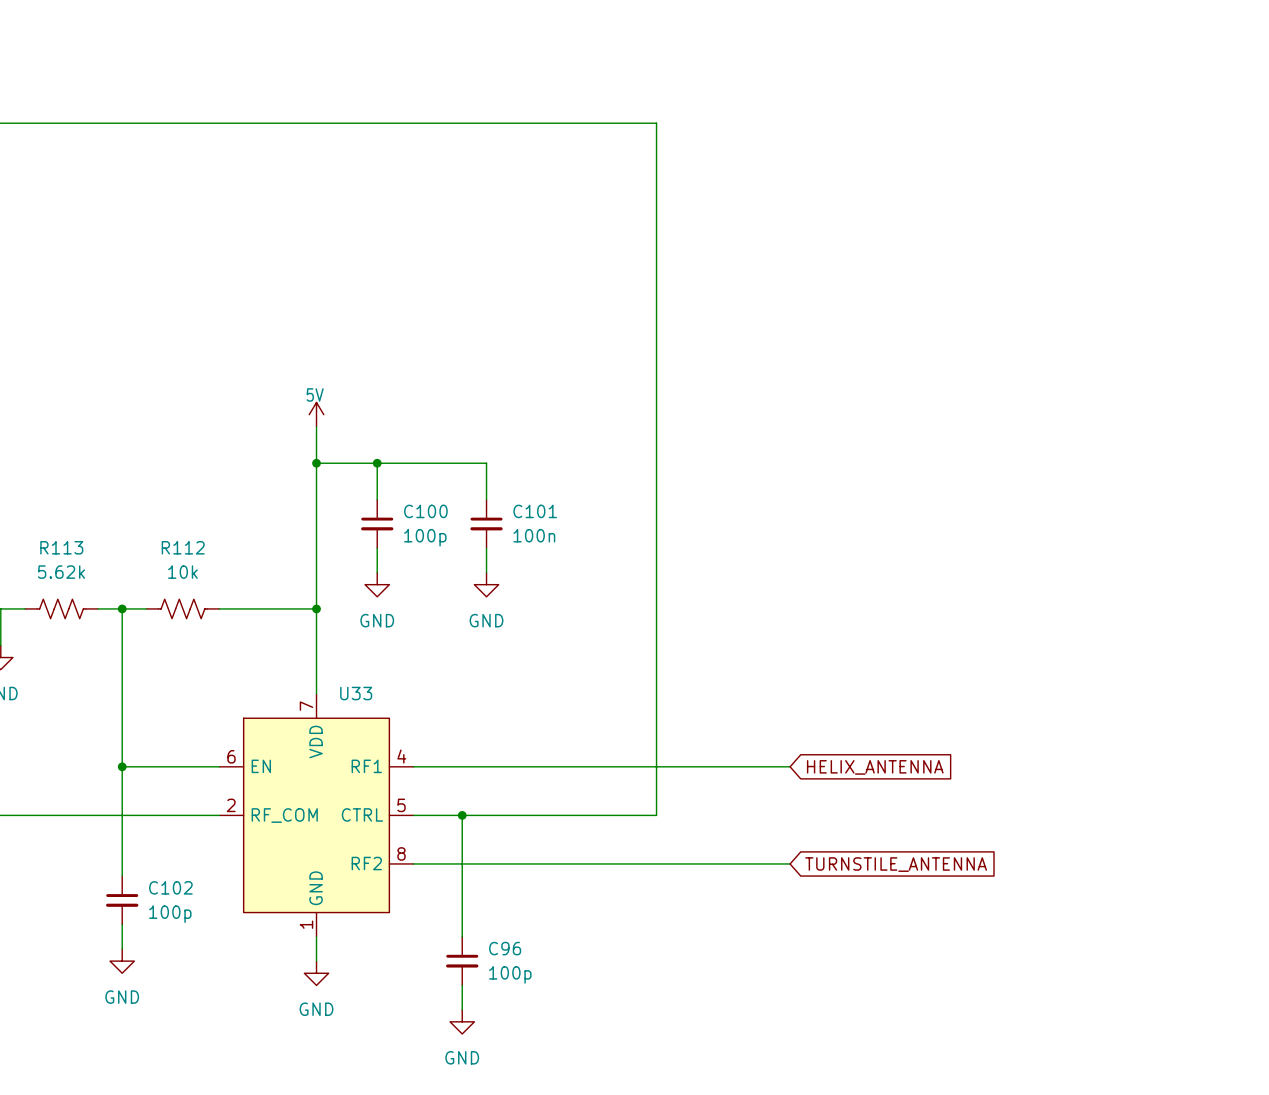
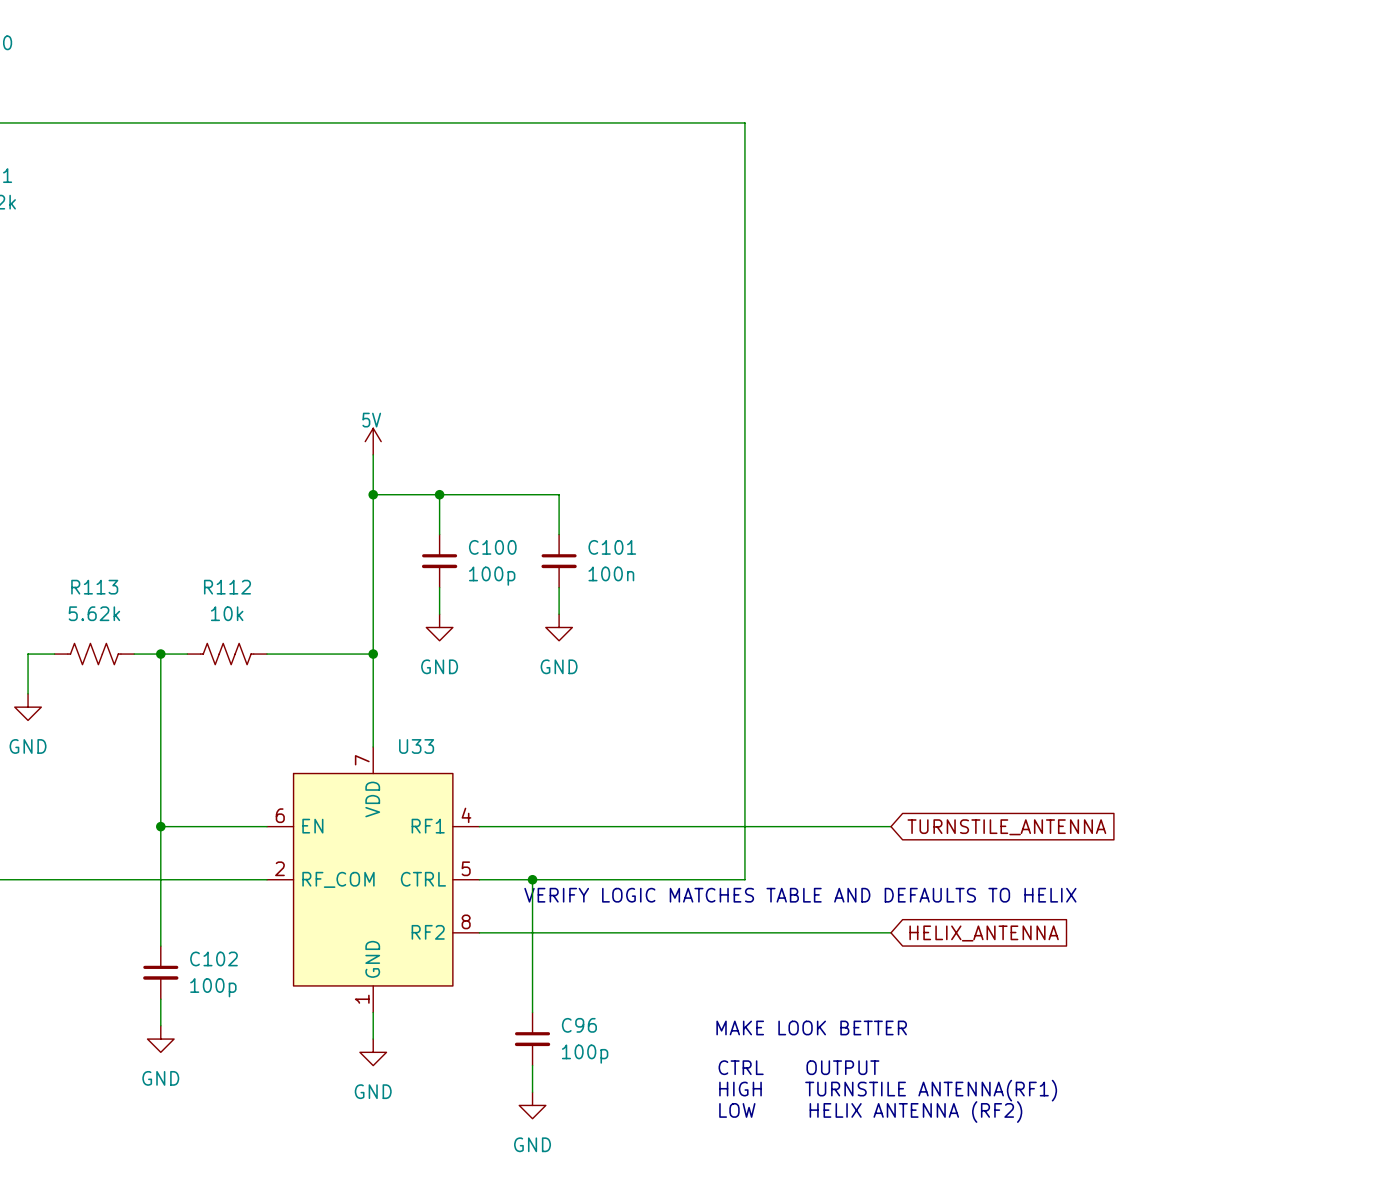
global label: HELIX_ANTENNA (875, 767) -> TURNSTILE_ANTENNA (1006, 827)
text: none -> VERIFY LOGIC MATCHES TABLE AND DEFAULTS TO HELIX (800, 895)
global label: TURNSTILE_ANTENNA (896, 864) -> HELIX_ANTENNA (984, 933)
text: none -> MAKE LOOK BETTER (811, 1027)
text: none -> CTRL OUTPUT (798, 1067)
text: none -> HIGH TURNSTILE ANTENNA(RF1) (888, 1090)
text: none -> LOW HELIX ANTENNA (RF2) (870, 1112)

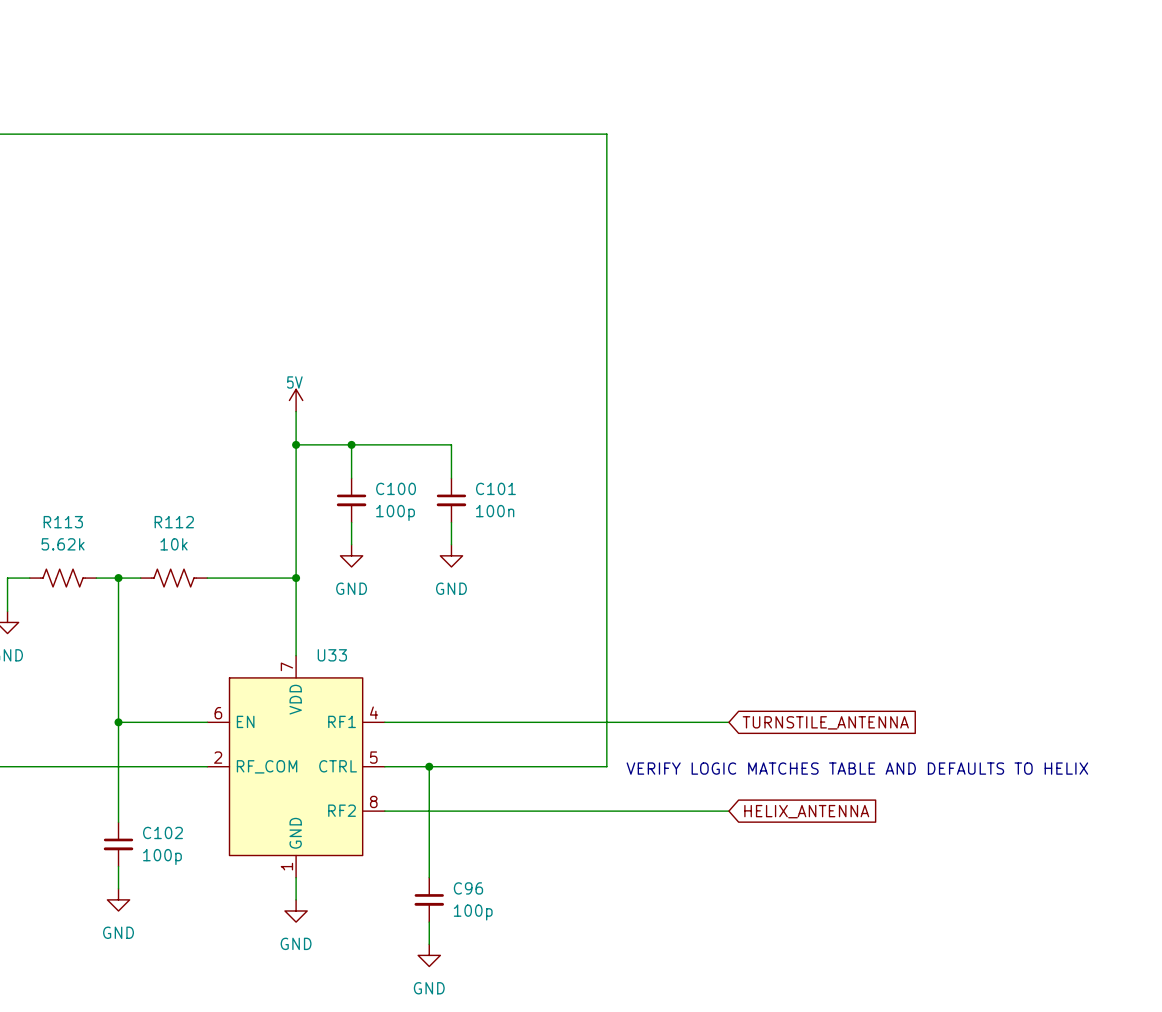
text position: VERIFY LOGIC MATCHES TABLE AND DEFAULTS TO HELIX (800, 895) -> VERIFY LOGIC MATCHES TABLE AND DEFAULTS TO HELIX (857, 768)
text: MAKE LOOK BETTER (811, 1027) -> none
text: CTRL OUTPUT (798, 1067) -> none
text: HIGH TURNSTILE ANTENNA(RF1) (888, 1090) -> none
text: LOW HELIX ANTENNA (RF2) (870, 1112) -> none

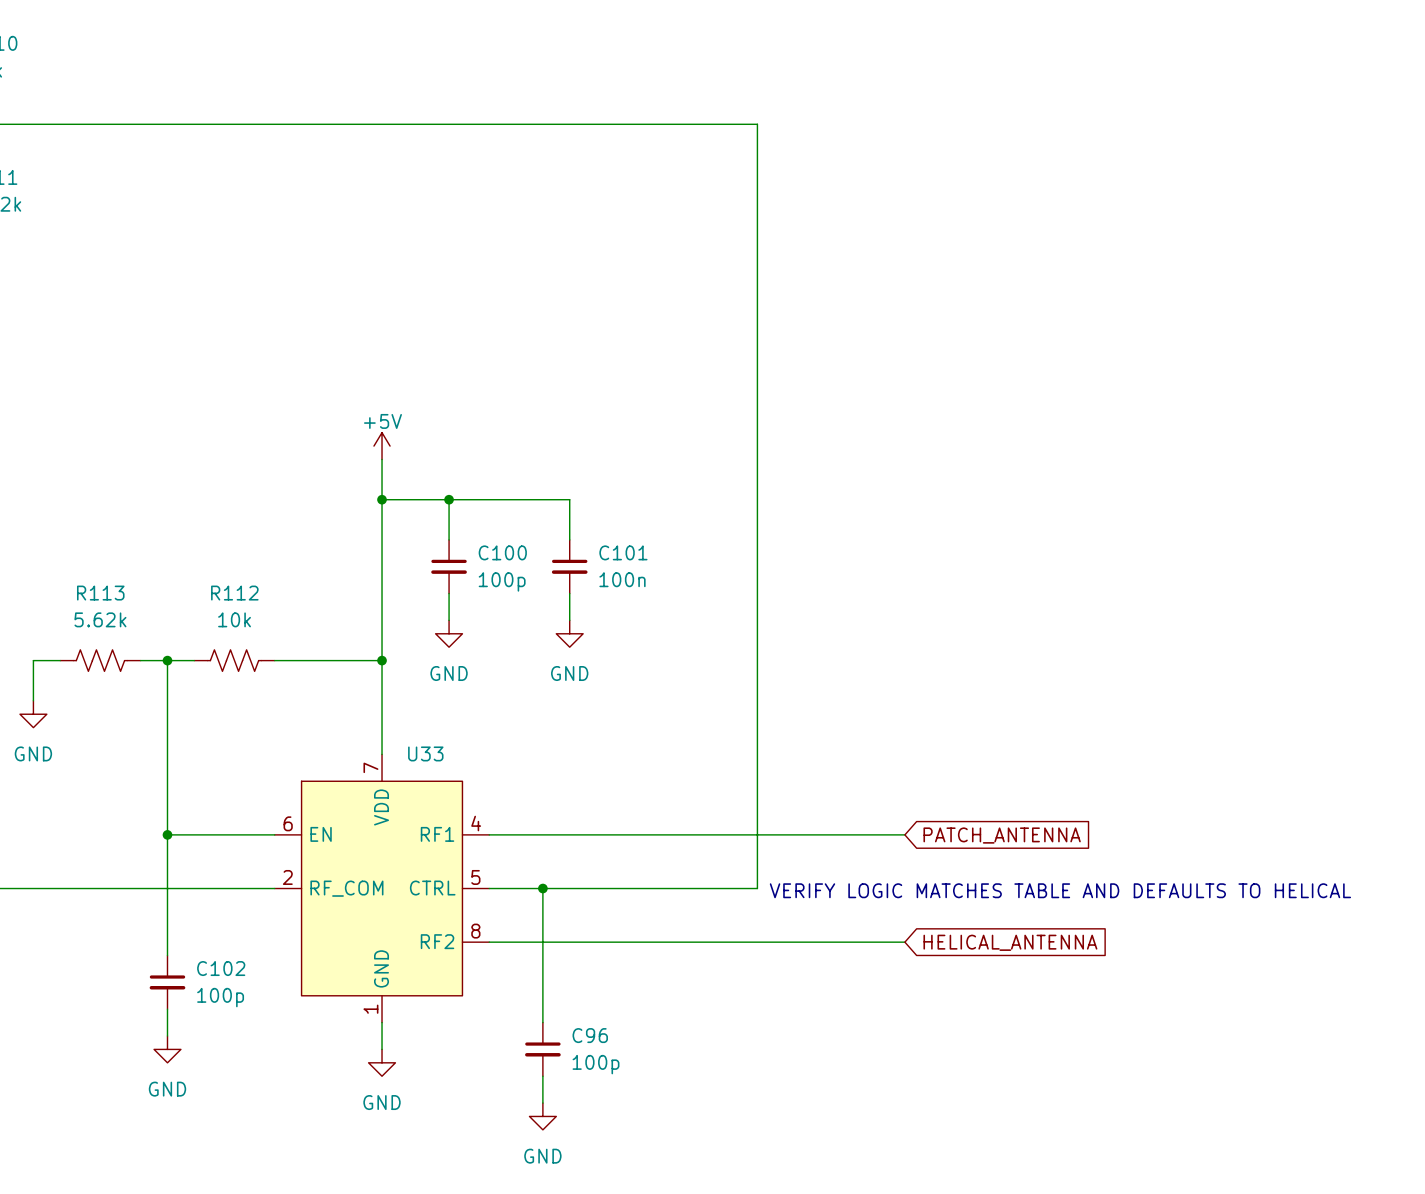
power symbol: 5V (296, 400) -> +5V (382, 446)
global label: TURNSTILE_ANTENNA (825, 722) -> PATCH_ANTENNA (1002, 835)
text: VERIFY LOGIC MATCHES TABLE AND DEFAULTS TO HELIX (857, 768) -> VERIFY LOGIC MATCHES TABLE AND DEFAULTS TO HELICAL (1060, 890)
global label: HELIX_ANTENNA (806, 811) -> HELICAL_ANTENNA (1010, 942)

